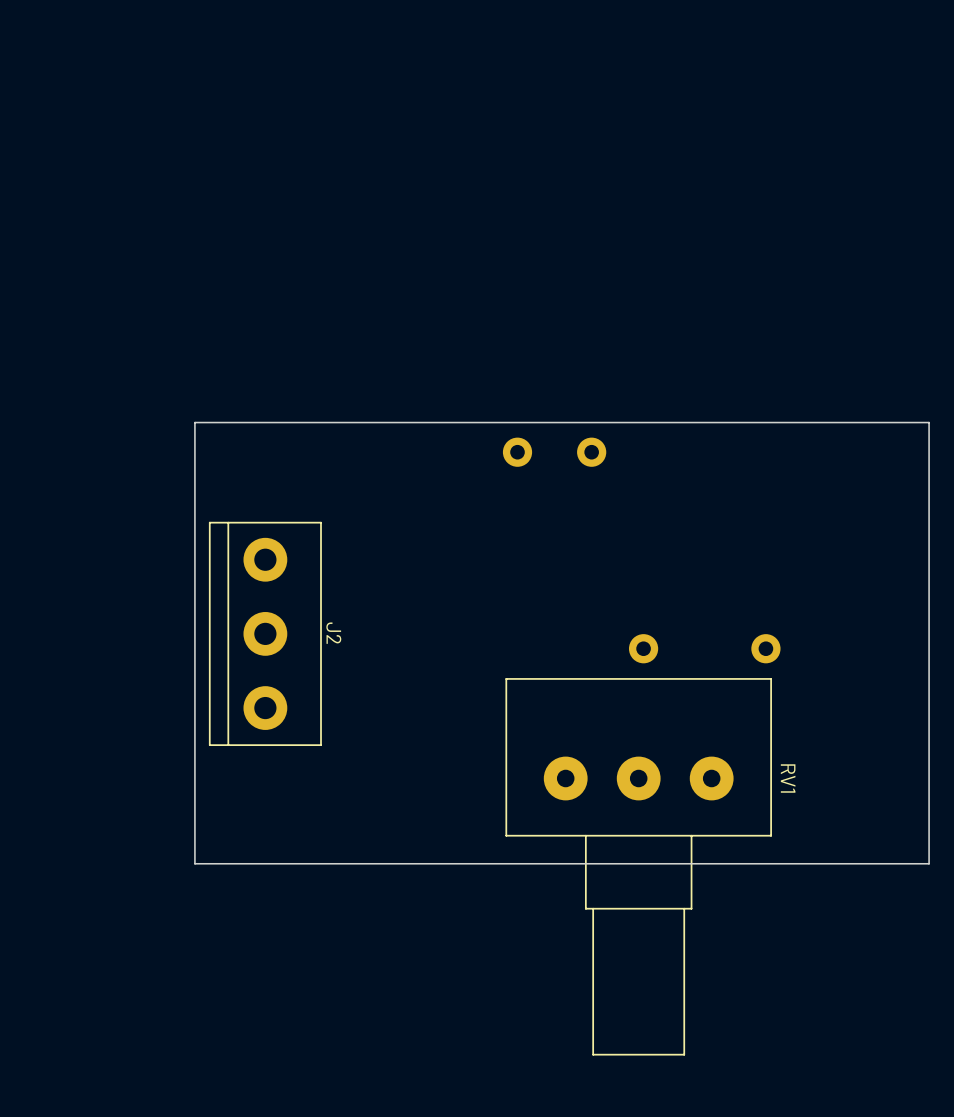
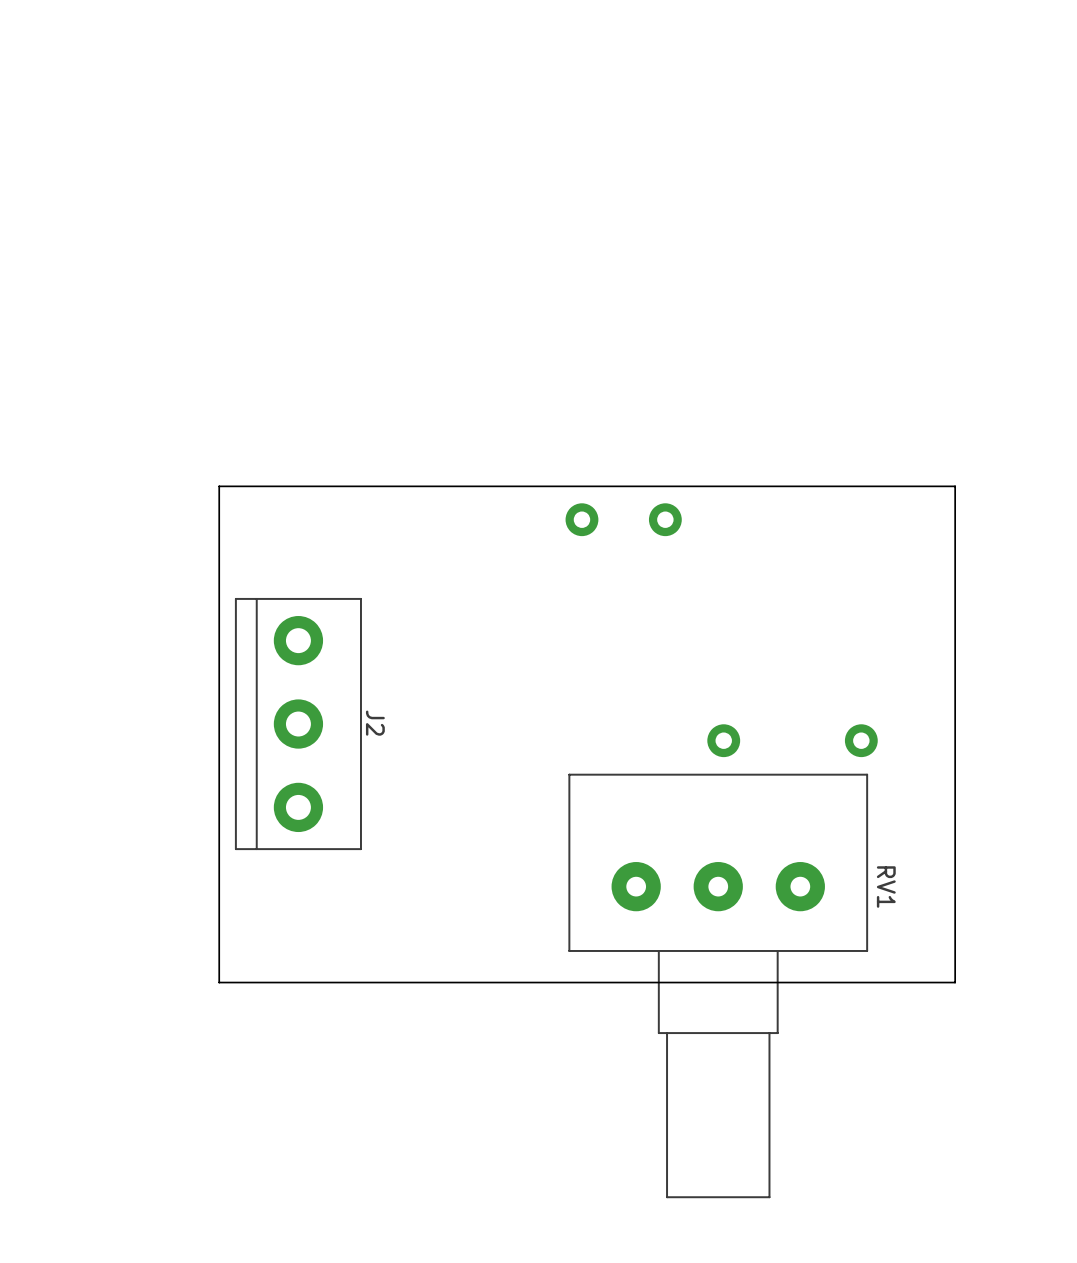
board edge: (849, 422) (929, 422) (929, 863) (849, 863) -> (955, 486) (955, 982)

